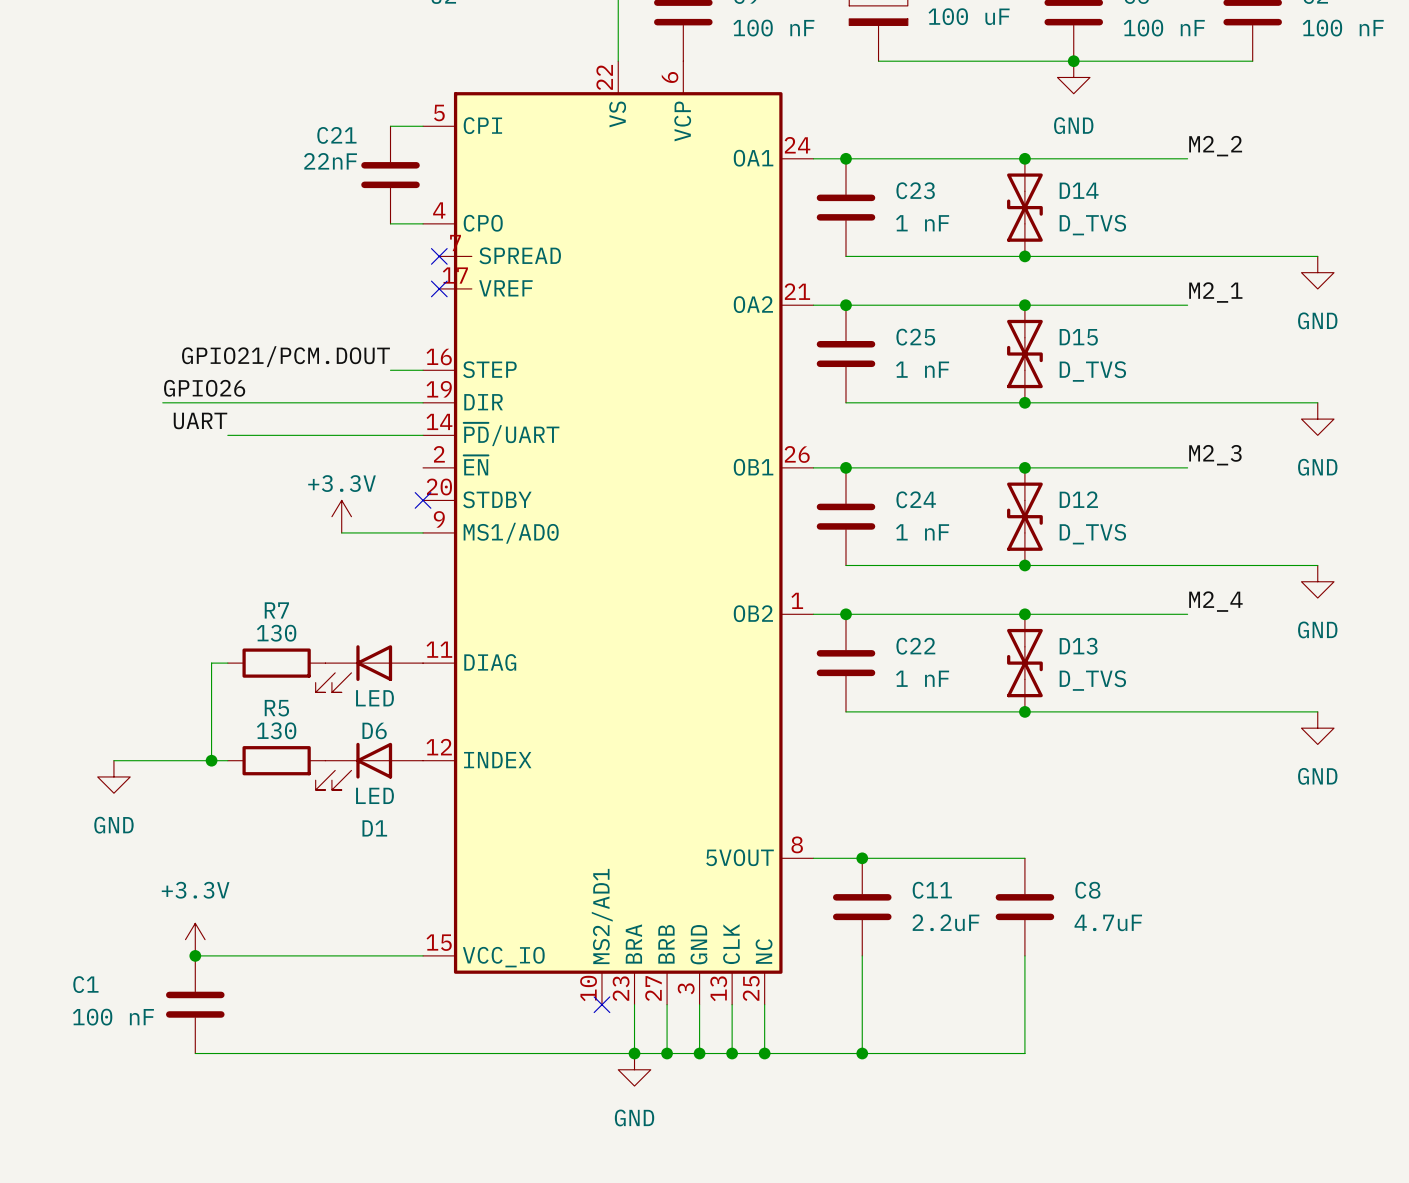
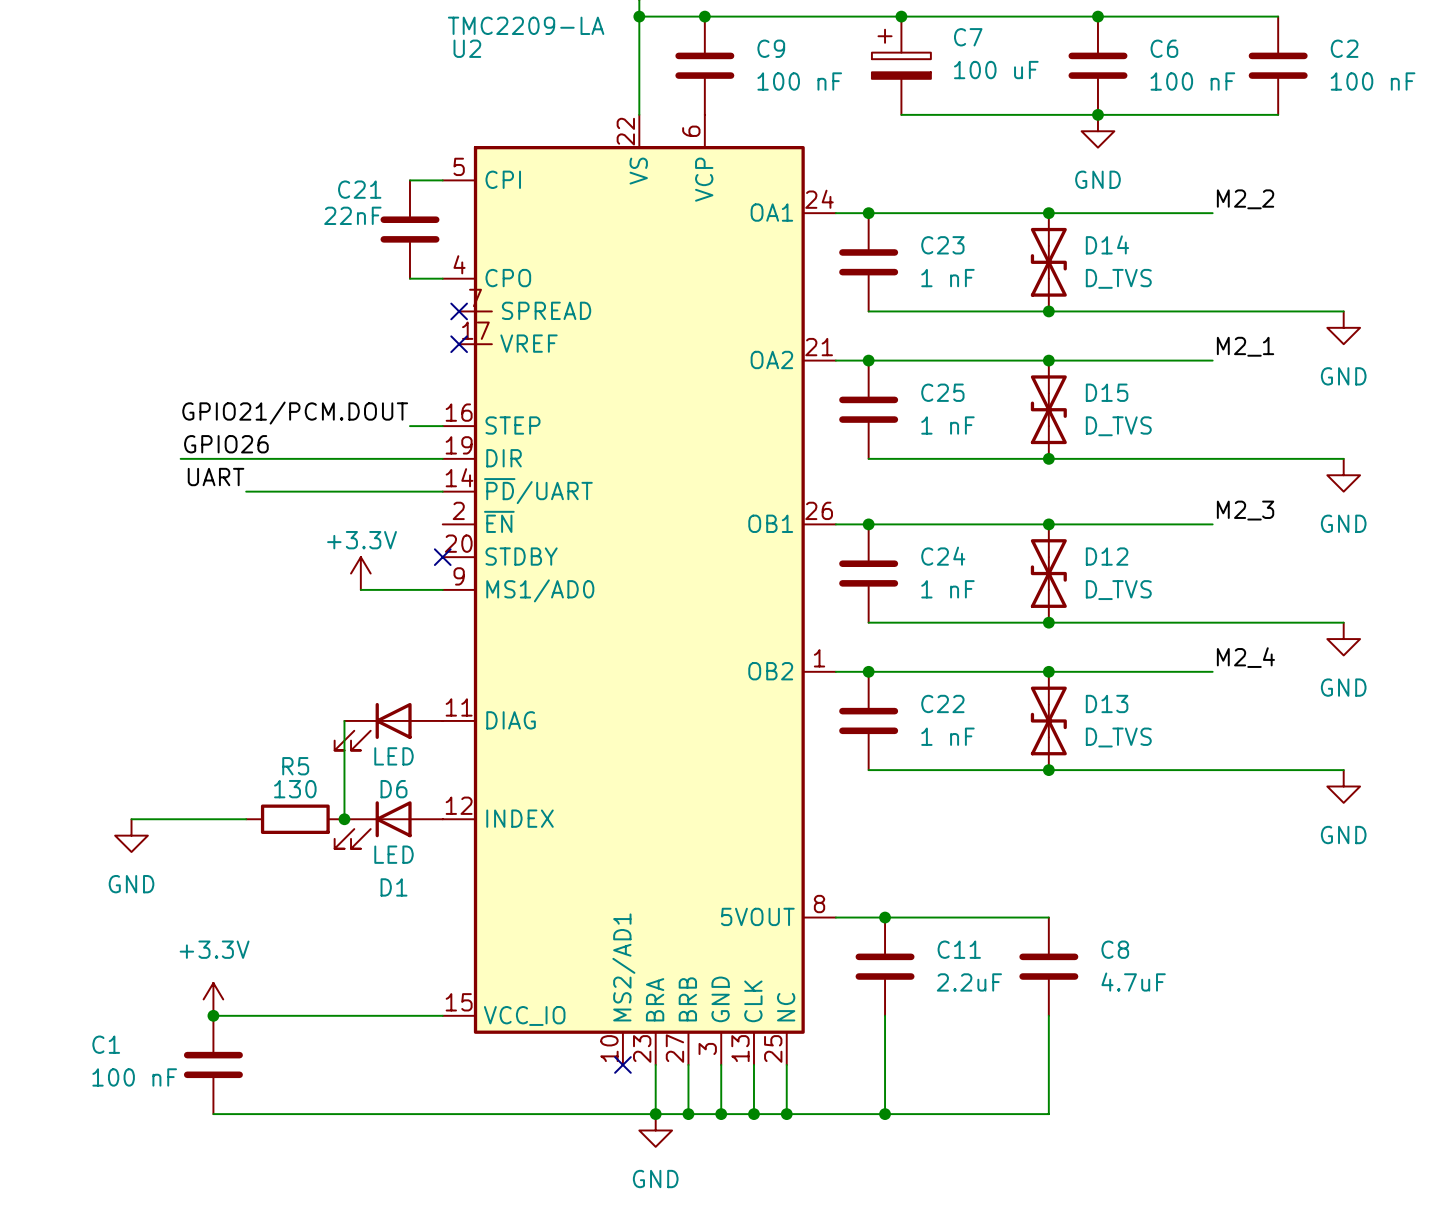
wire: (227, 663) (211, 663) (211, 760) -> none
R7: 130 (276, 663) -> none
wire: none -> (344, 720) (344, 819)
junction: (211, 760) -> none
junction: none -> (344, 819)

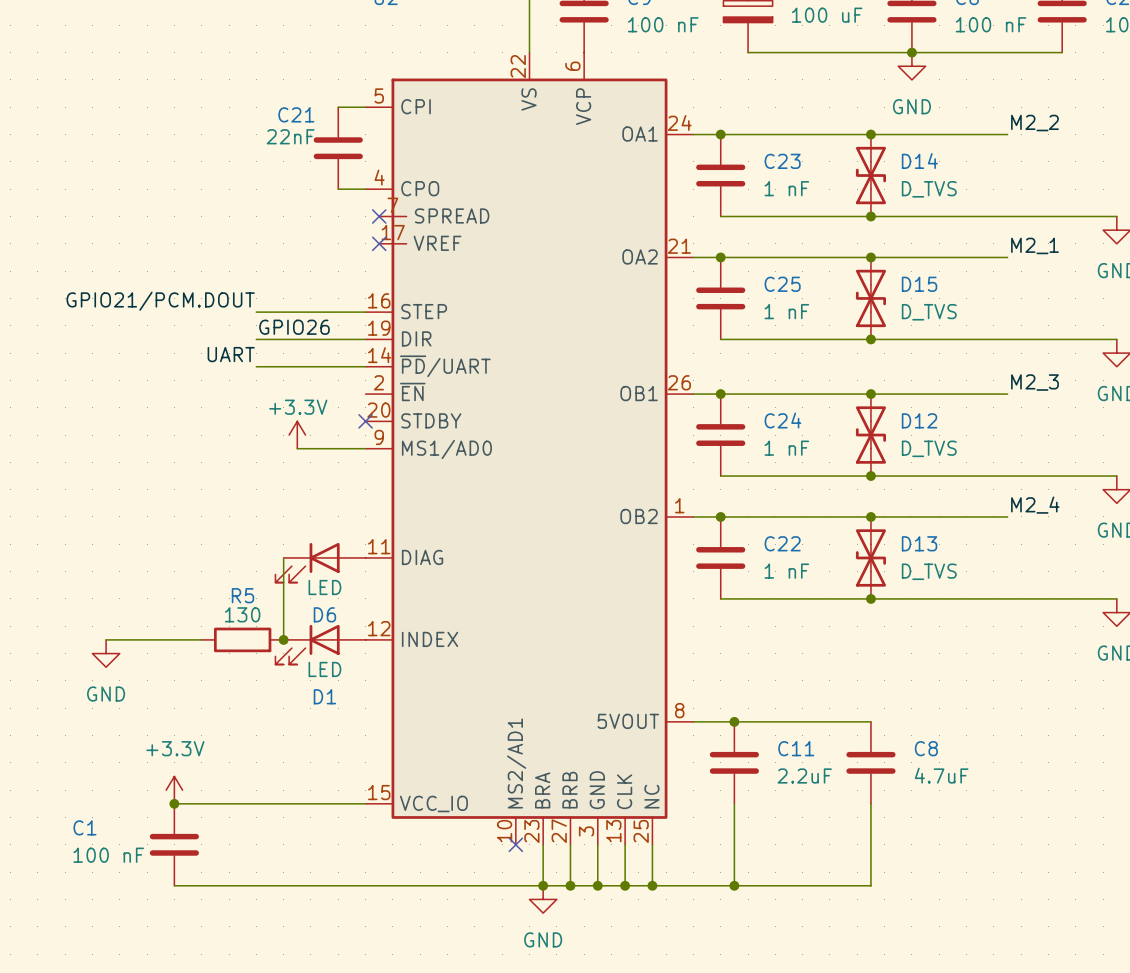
label position: GPIO21/PCM.DOUT (295, 413) -> GPIO21/PCM.DOUT (160, 301)
wire: none -> (256, 312) (338, 312)
label position: GPIO26 (226, 444) -> GPIO26 (294, 327)
wire: (180, 458) (311, 458) -> none
label position: UART (216, 477) -> UART (231, 354)
wire: (246, 491) (311, 491) -> none

